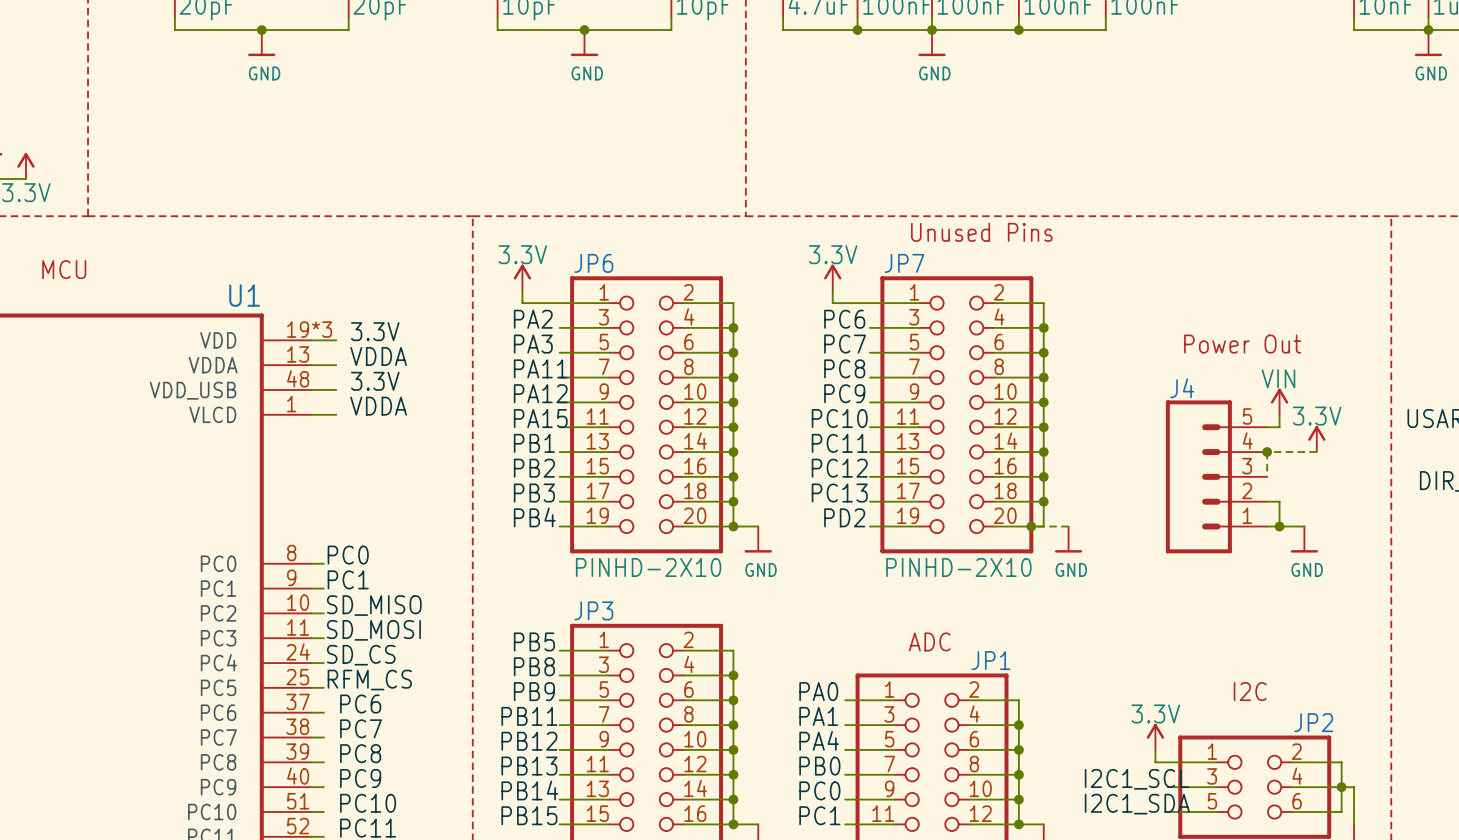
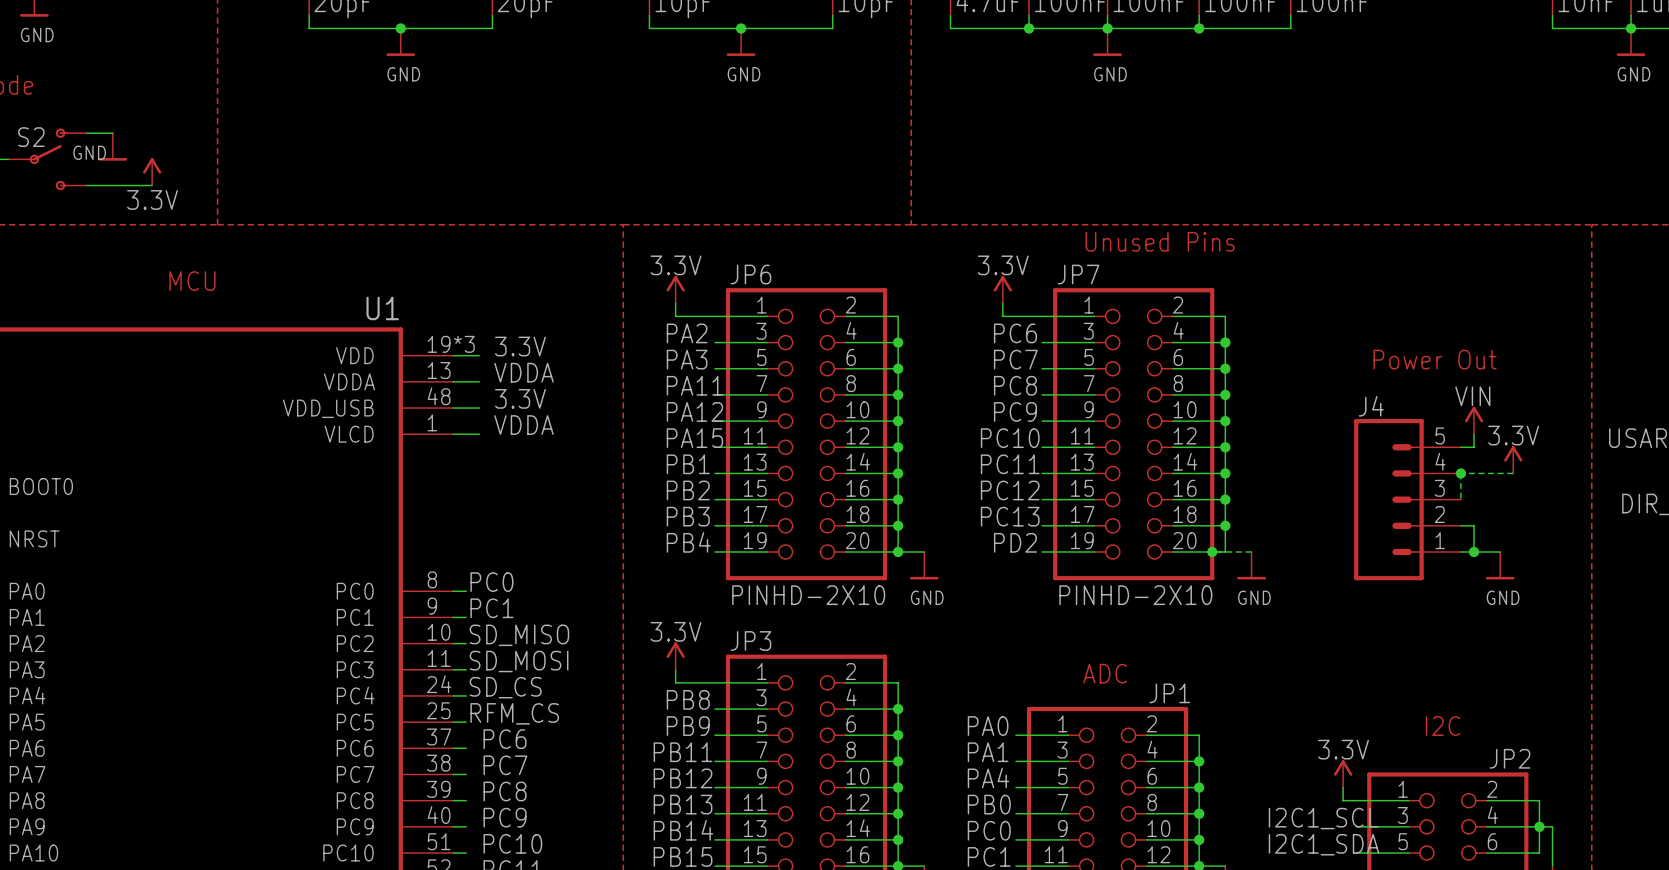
power symbol: none -> 3.3V (675, 656)
wire: none -> (675, 669) (675, 682) (714, 682)
label: PB5 (534, 641) -> none

